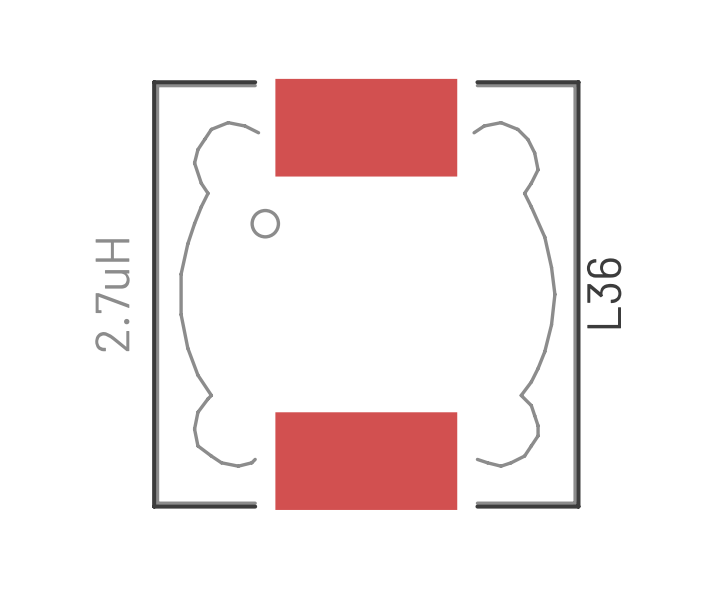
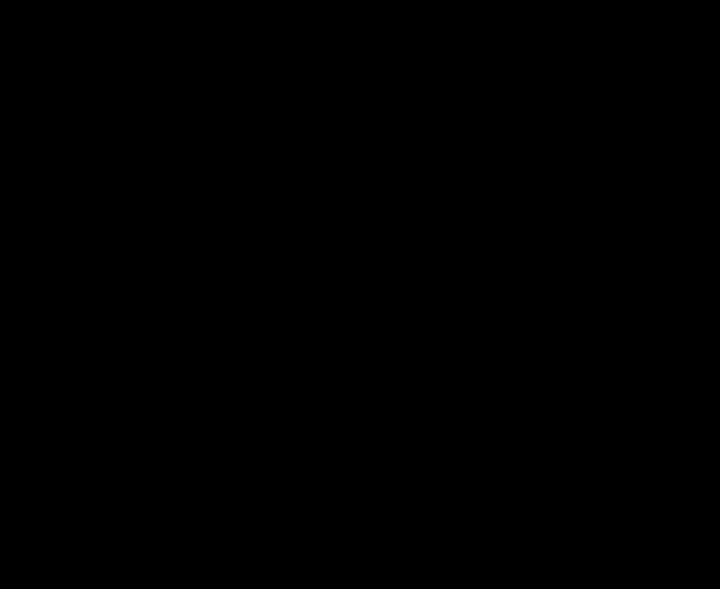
L36: 2.7uH (366, 294) -> none

